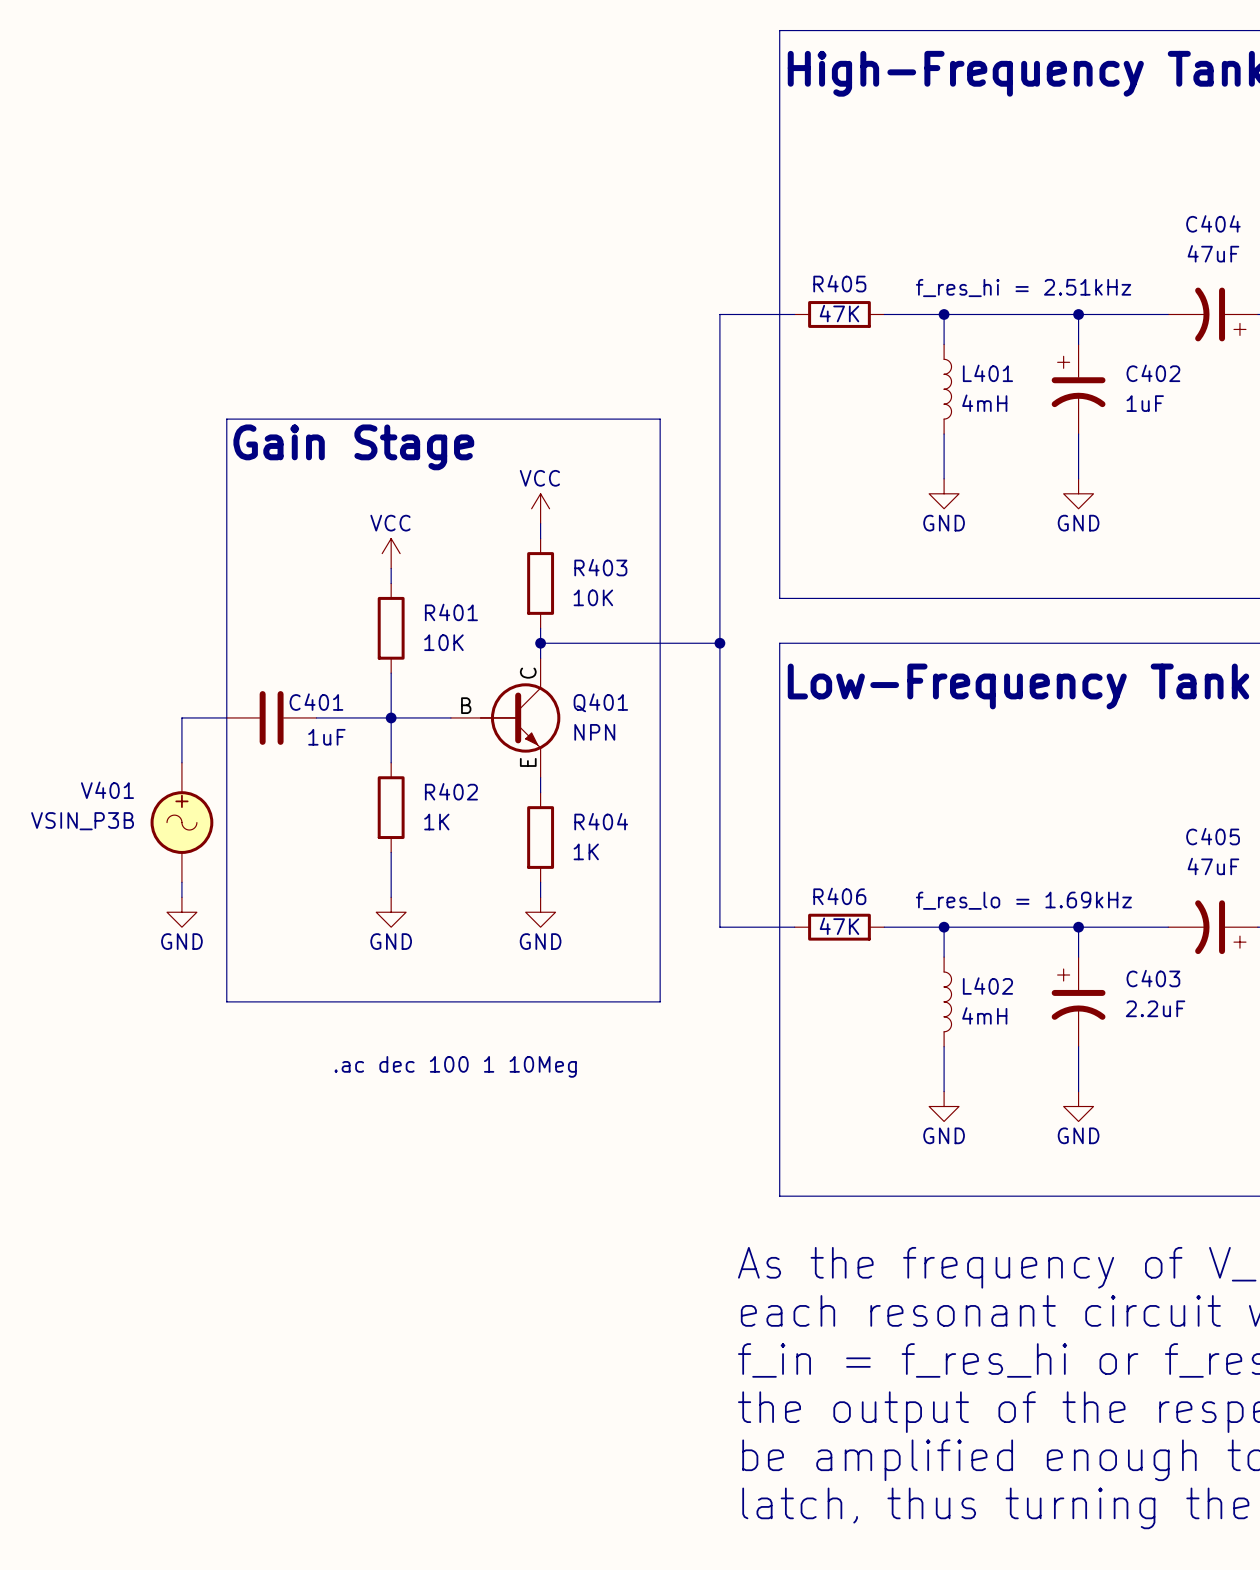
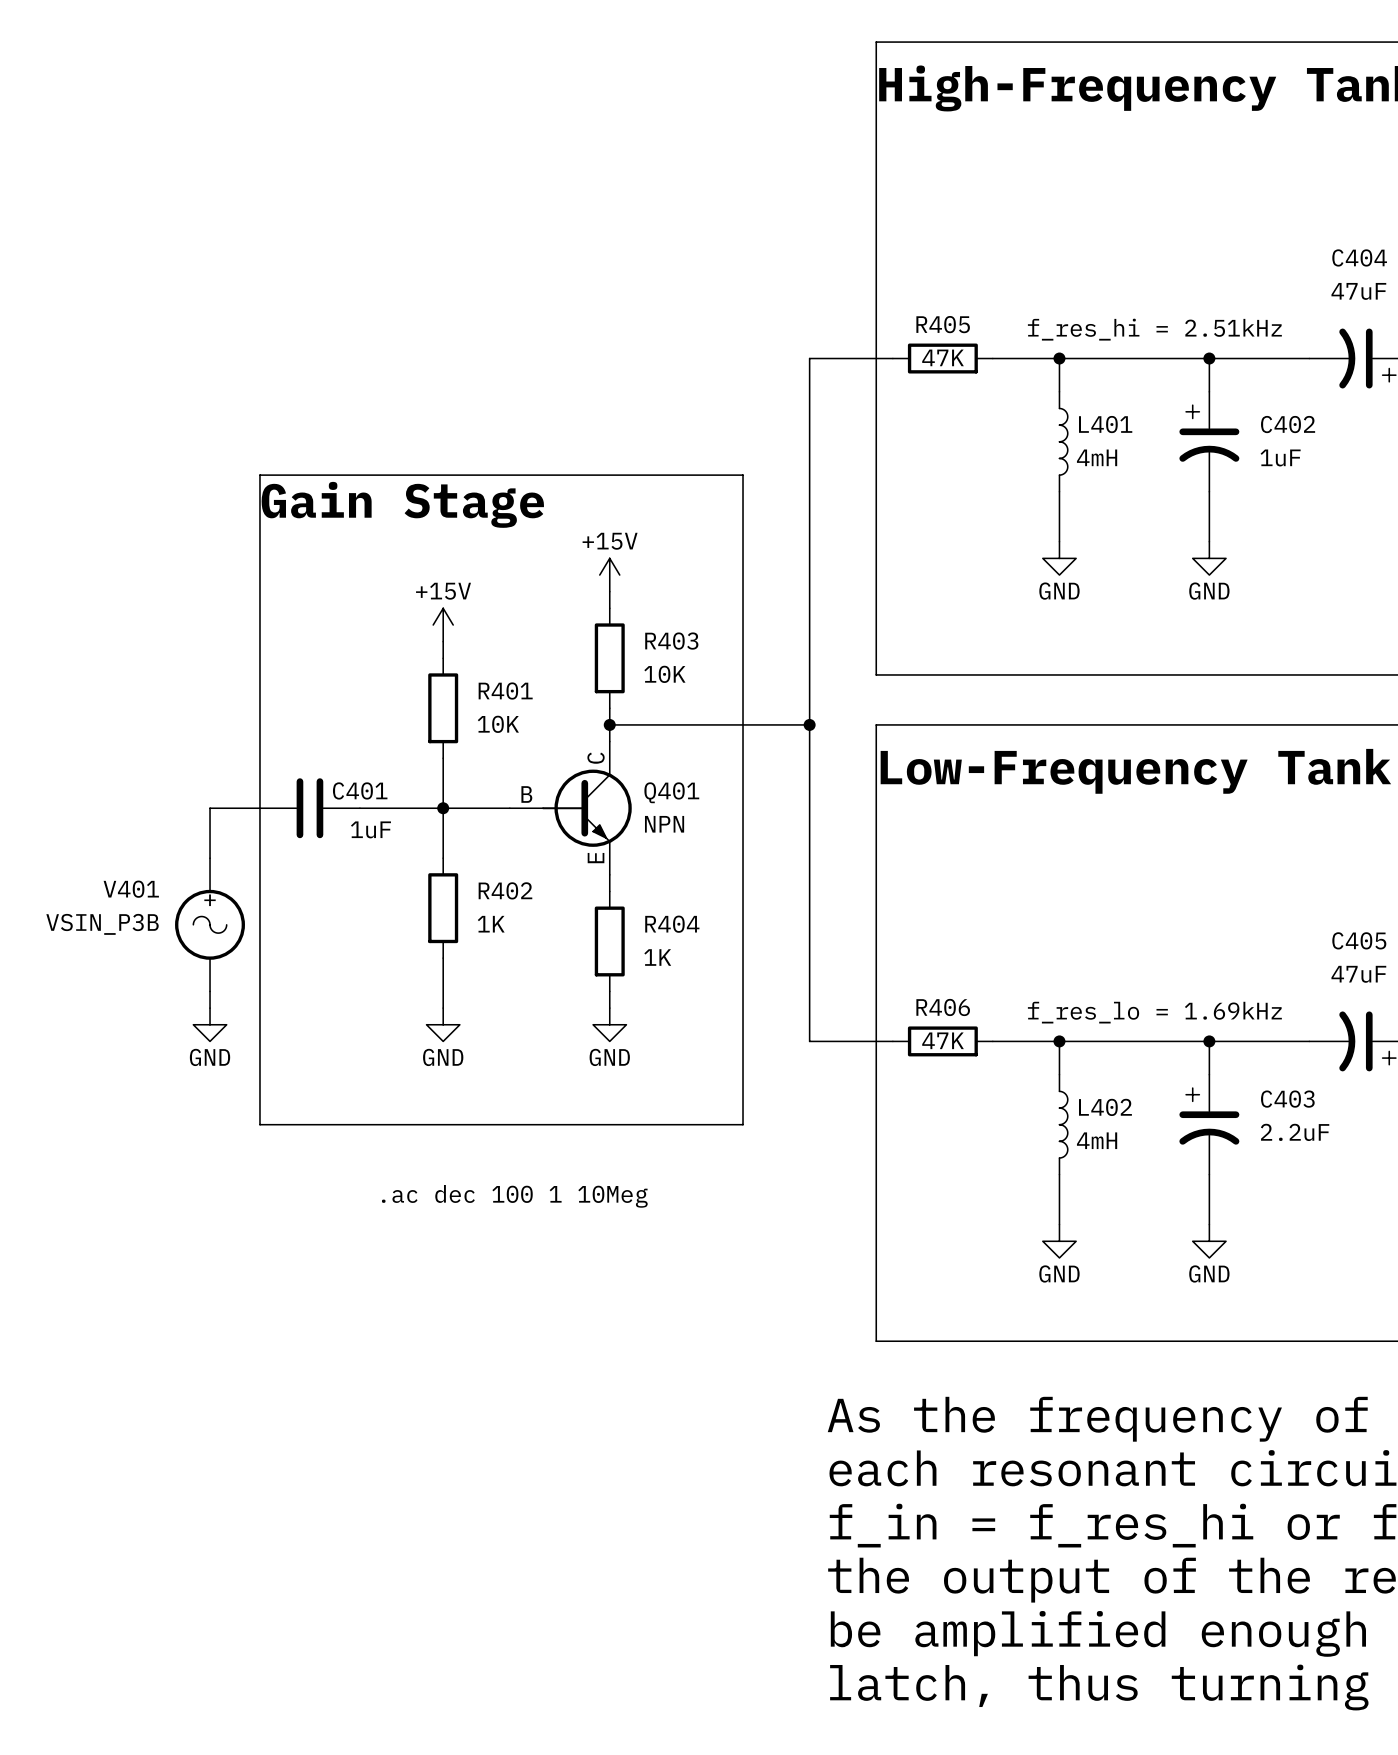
power symbol: VCC (540, 508) -> +15V (609, 575)
power symbol: VCC (391, 553) -> +15V (443, 625)

